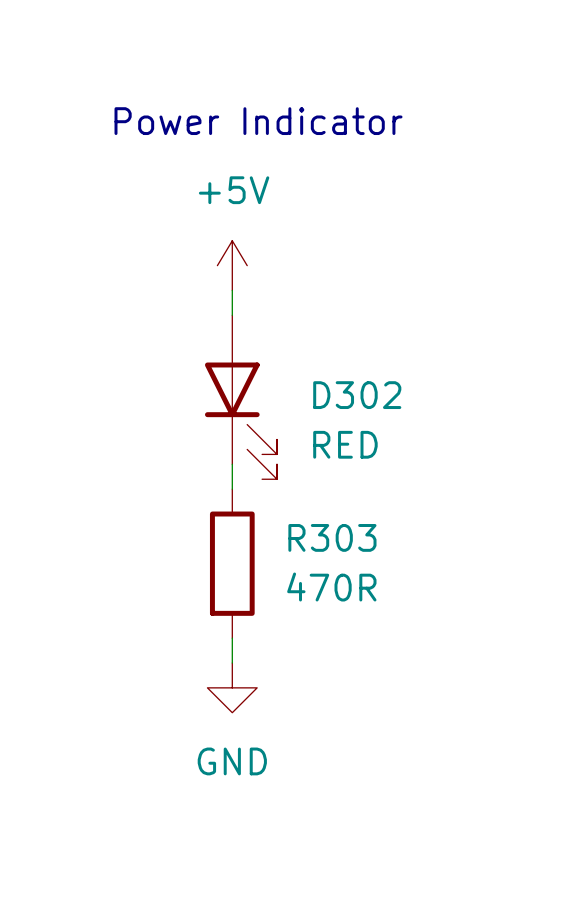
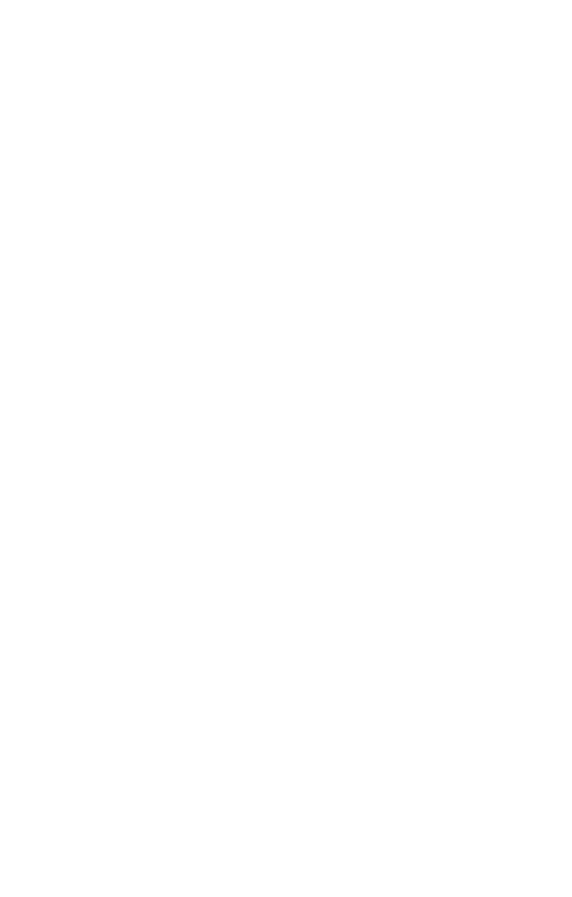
text: Power Indicator (258, 121) -> none
power symbol: +5V (232, 265) -> none
wire: (232, 290) (232, 315) -> none
D302: RED (241, 397) -> none
wire: (232, 464) (232, 489) -> none
R303: 470R (232, 563) -> none
wire: (232, 638) (232, 663) -> none
power symbol: GND (232, 687) -> none

